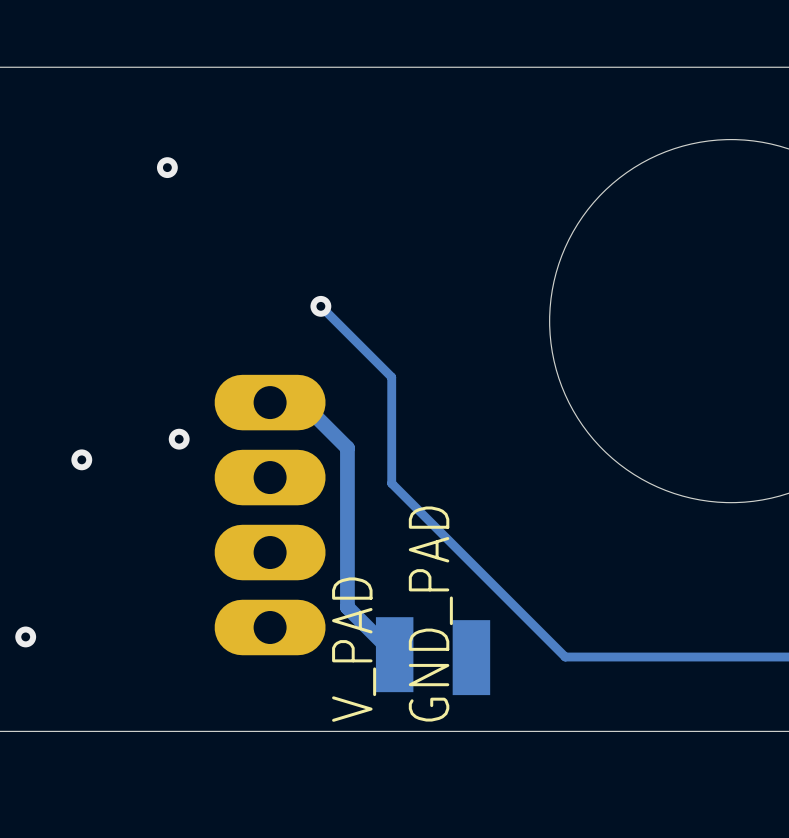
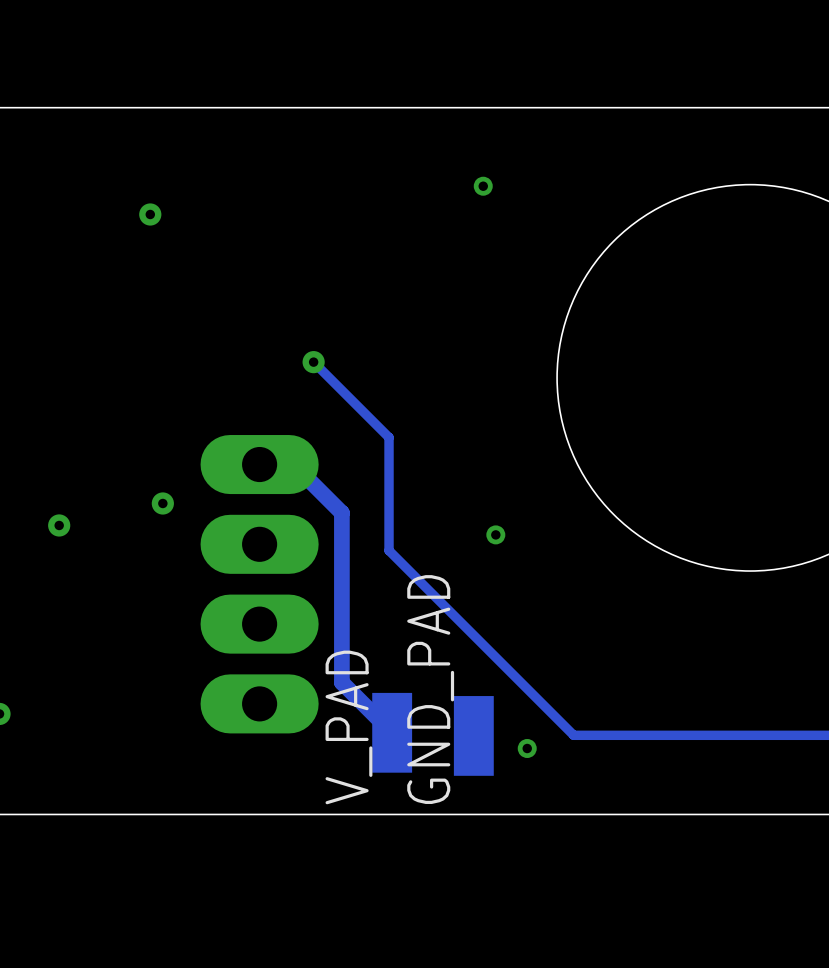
via: none -> (483, 186)
via: none -> (495, 534)
via: none -> (527, 748)

